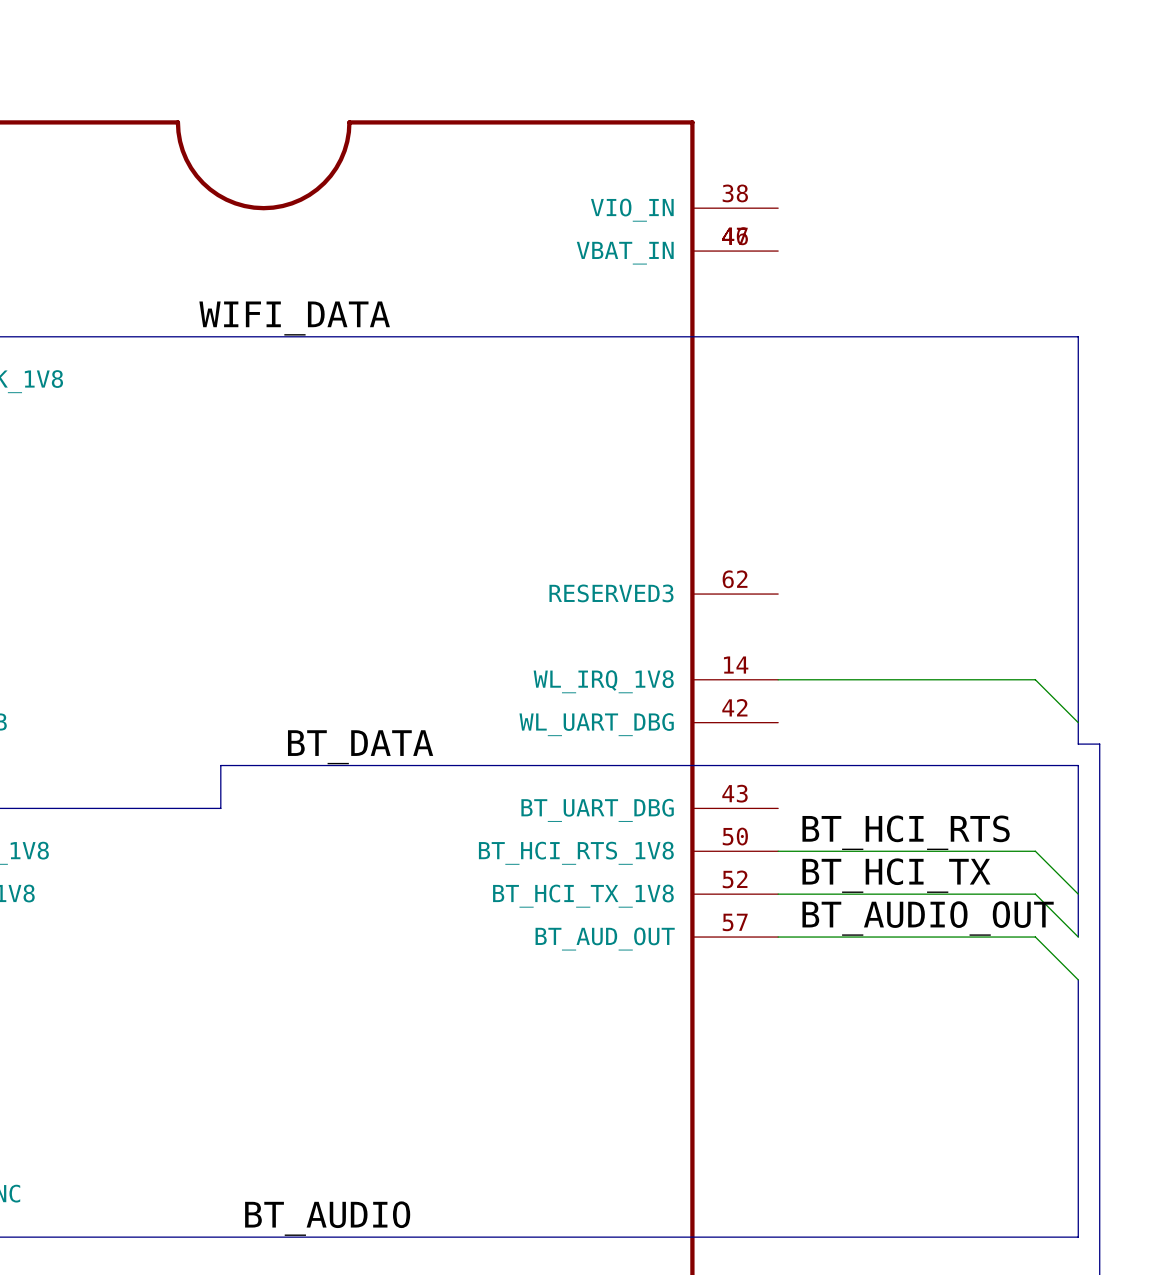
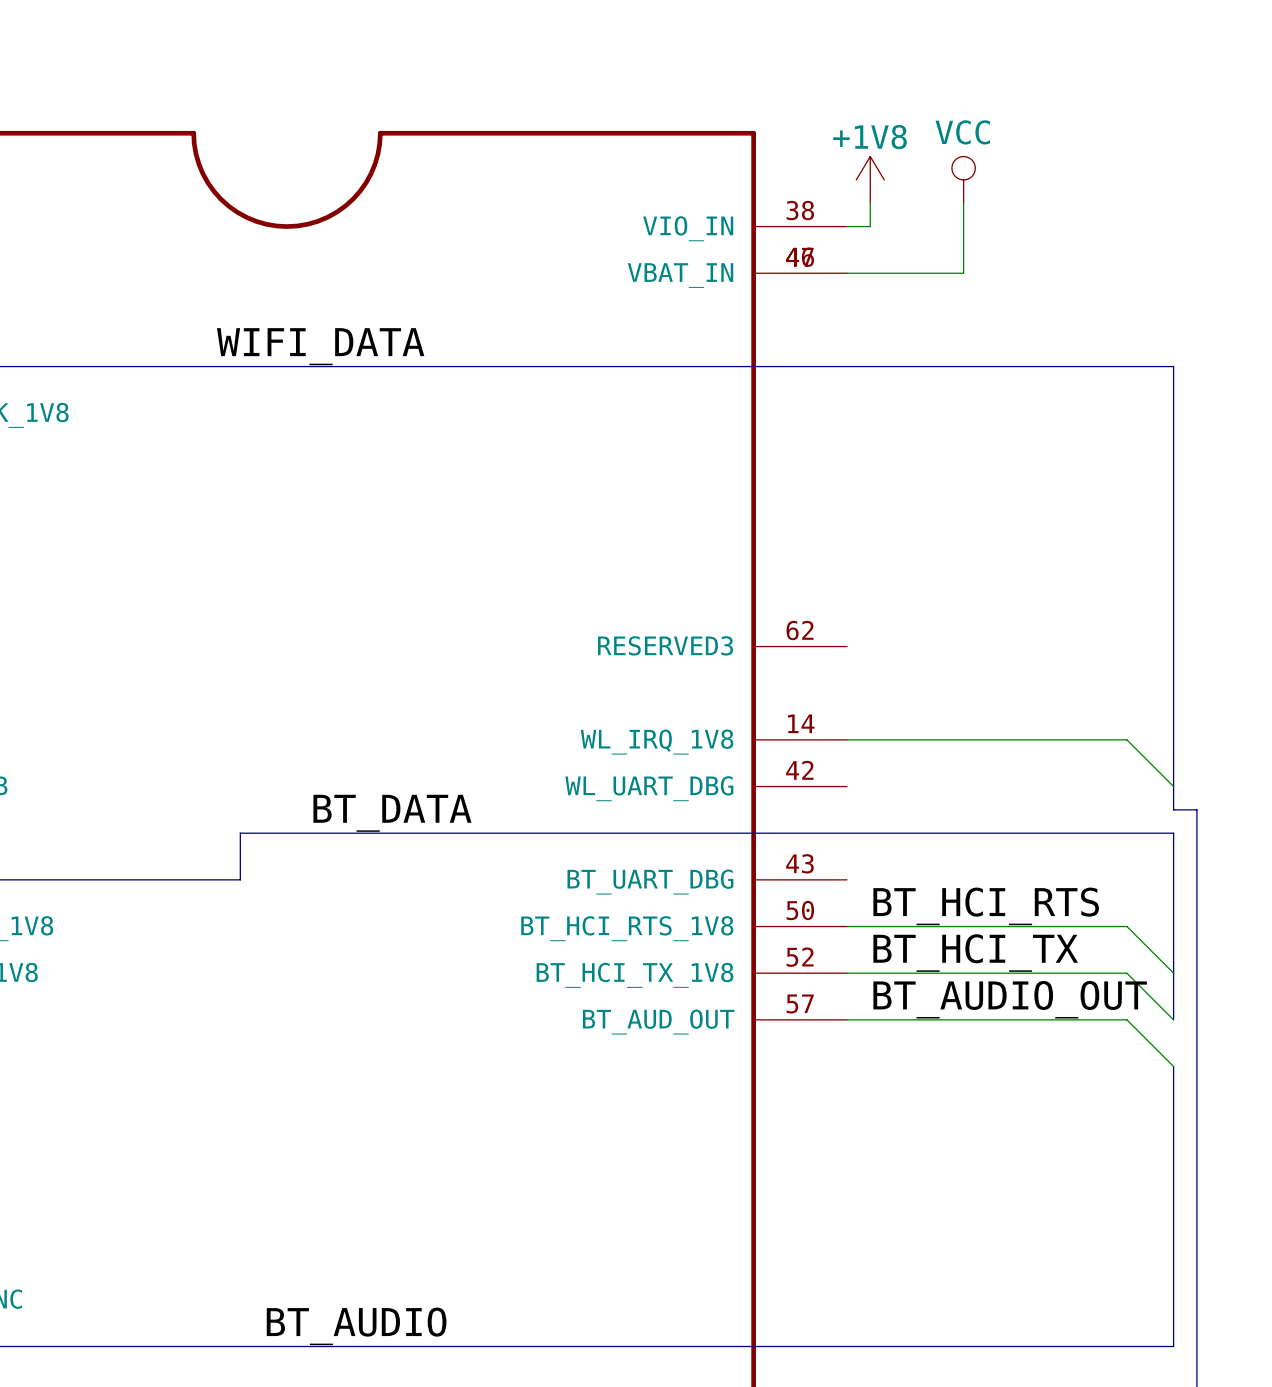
power symbol: none -> +1V8 (870, 179)
power symbol: none -> VCC (963, 179)
wire: none -> (870, 203) (870, 226) (846, 226)
wire: none -> (963, 203) (963, 273) (846, 273)

